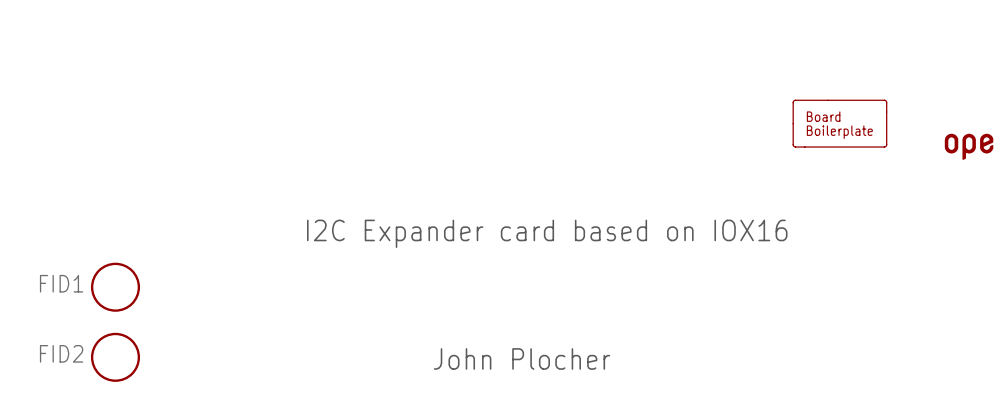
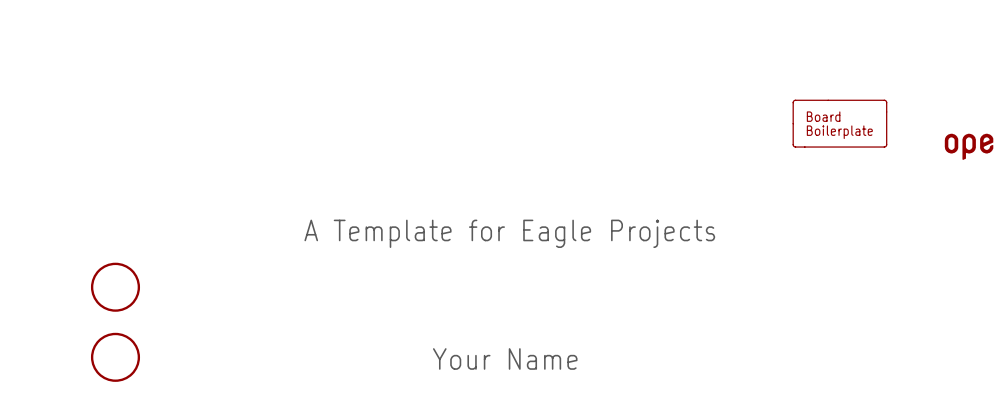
text: I2C Expander card based on IOX16 (547, 233) -> A Template for Eagle Projects (509, 233)
FID1 name: FID1 (61, 283) -> none
FID2 name: FID2 (61, 353) -> none
text: John Plocher (522, 358) -> Your Name (505, 358)

